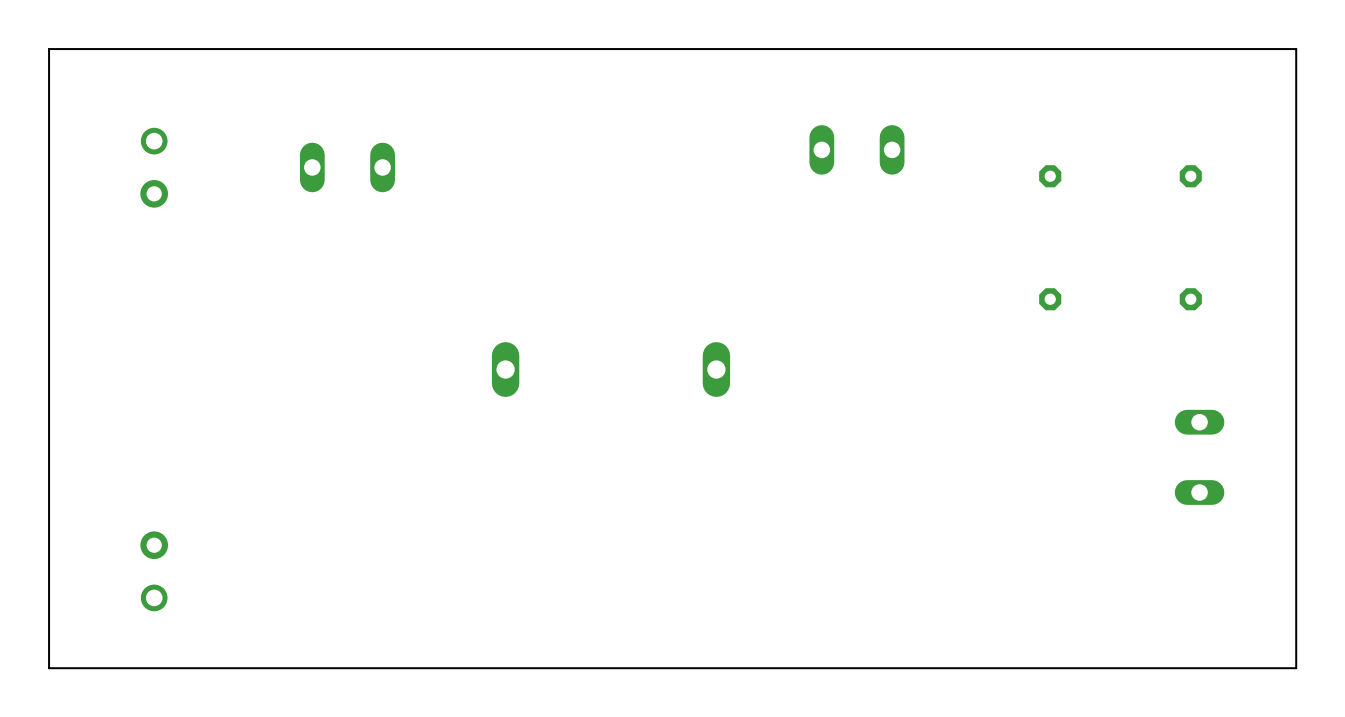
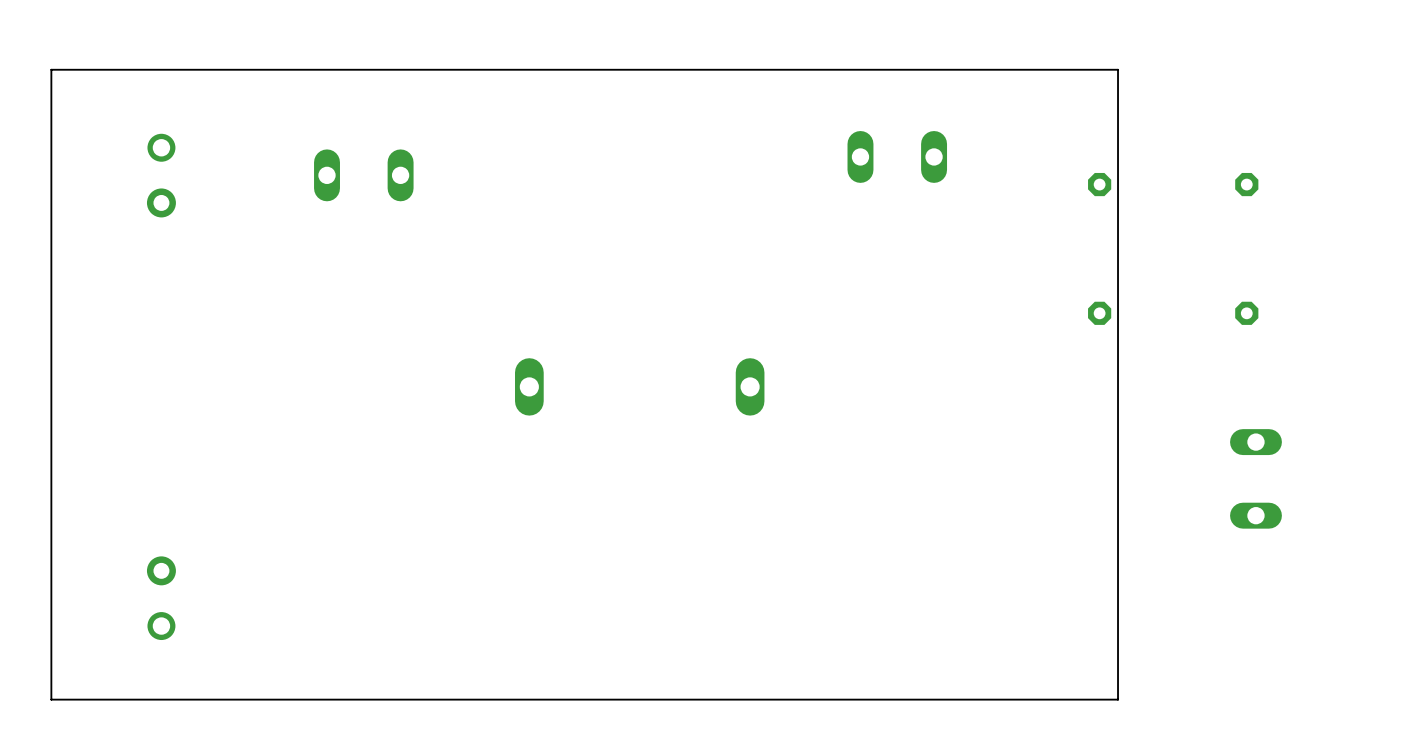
board edge: (49, 66) (49, 49) (1296, 49) (1296, 668) (1067, 668) -> (51, 69) (1118, 69) (1118, 699)

